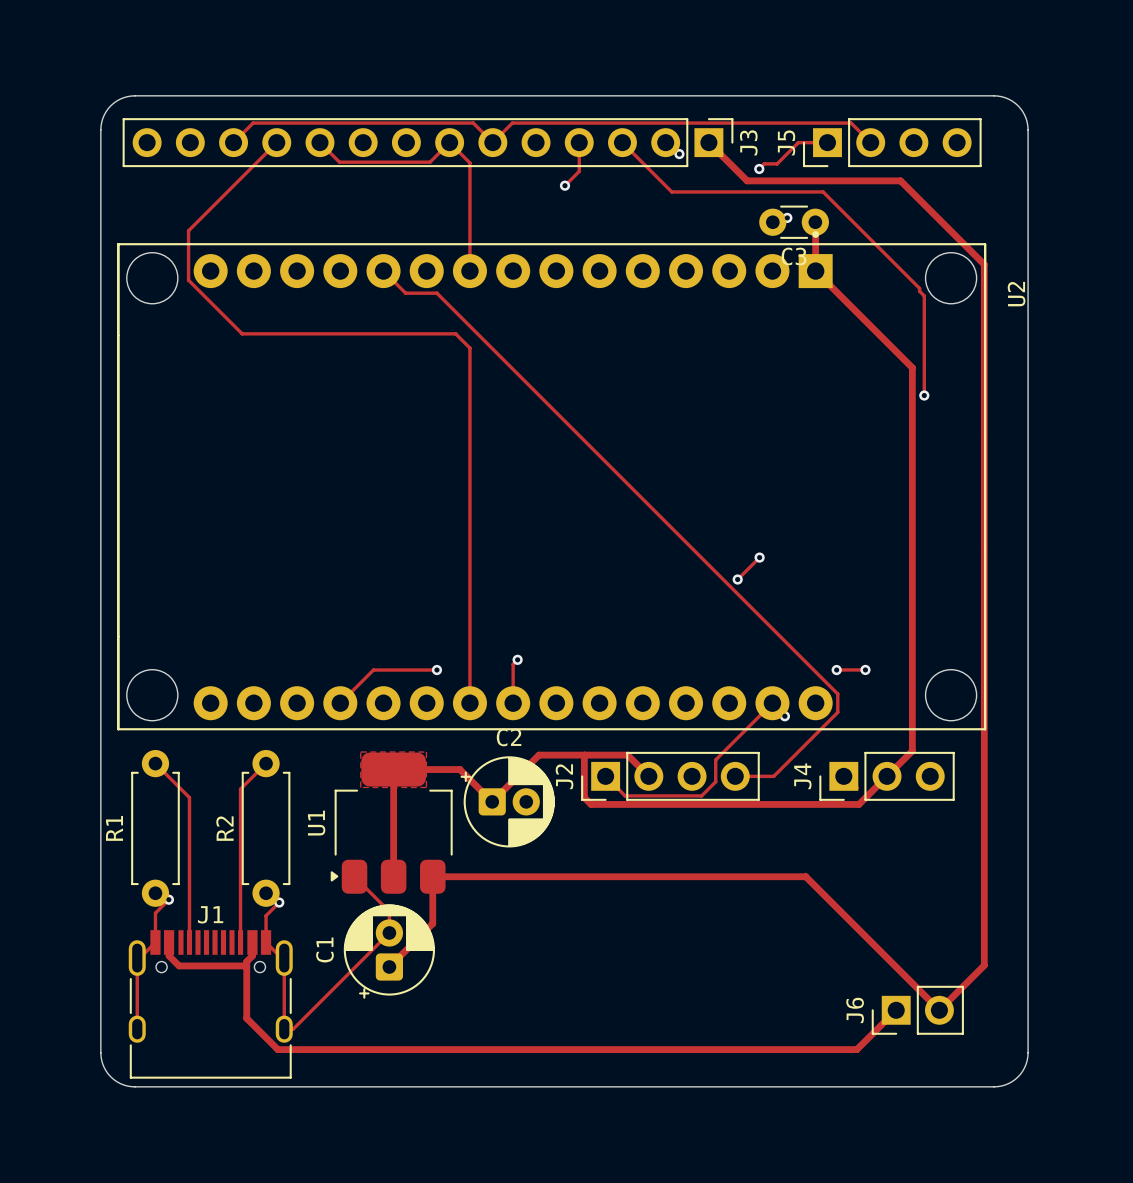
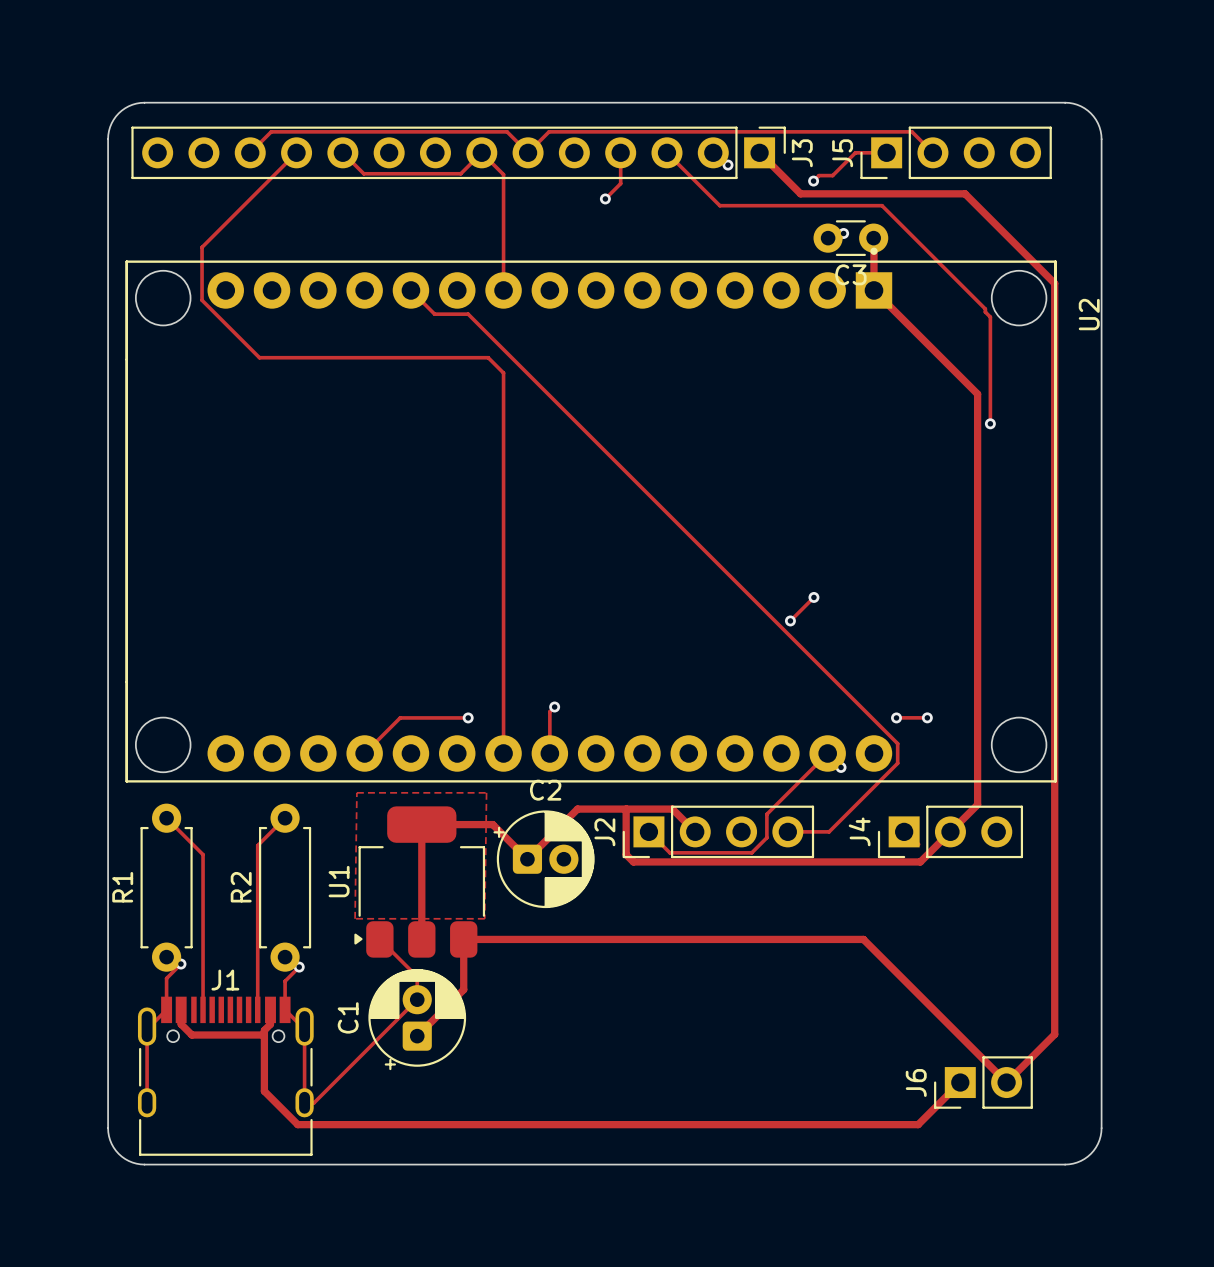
zone outline: none -> (356, 792) (486, 792) (484, 918) (355, 918) (356, 792)
zone outline: (360, 752) (426, 752) (426, 787) (360, 787) (360, 752) -> none

